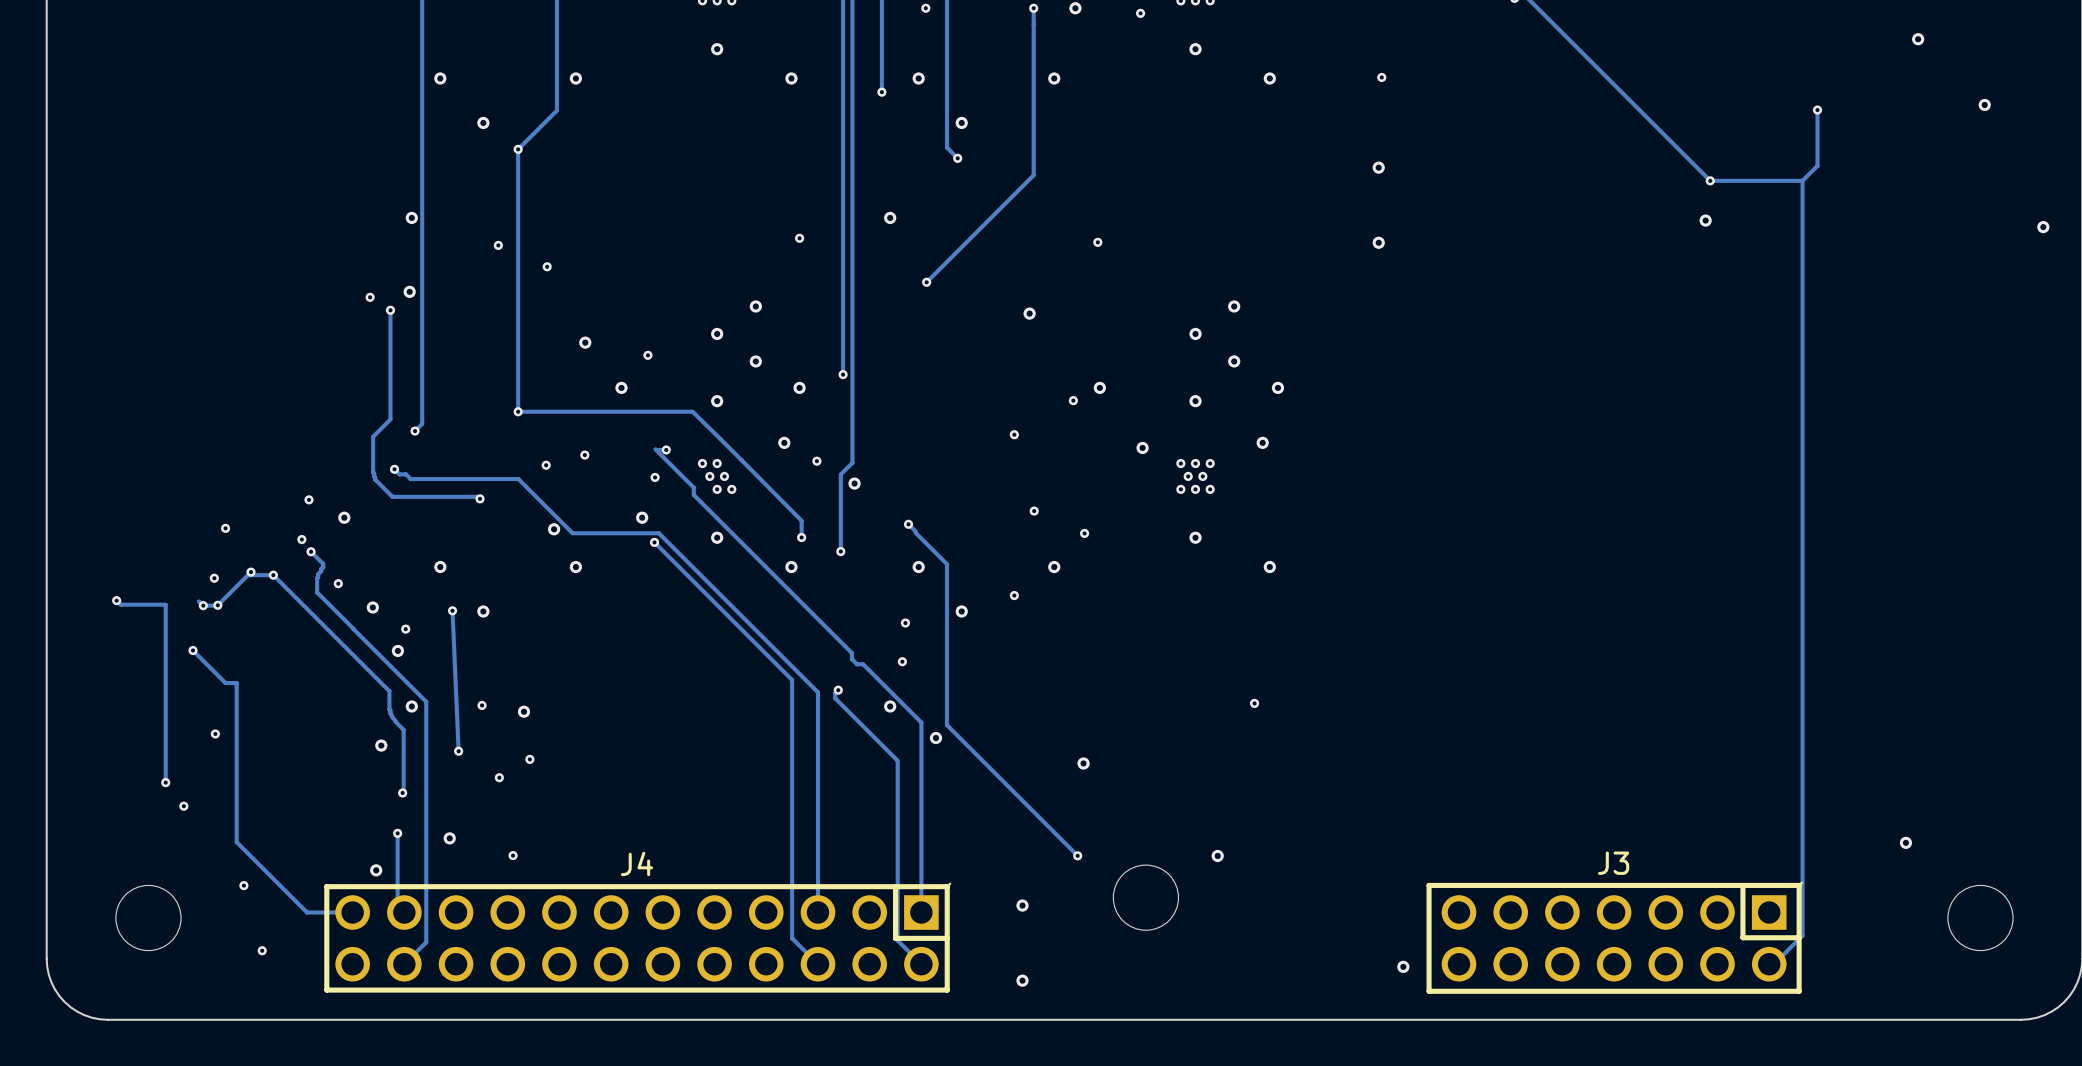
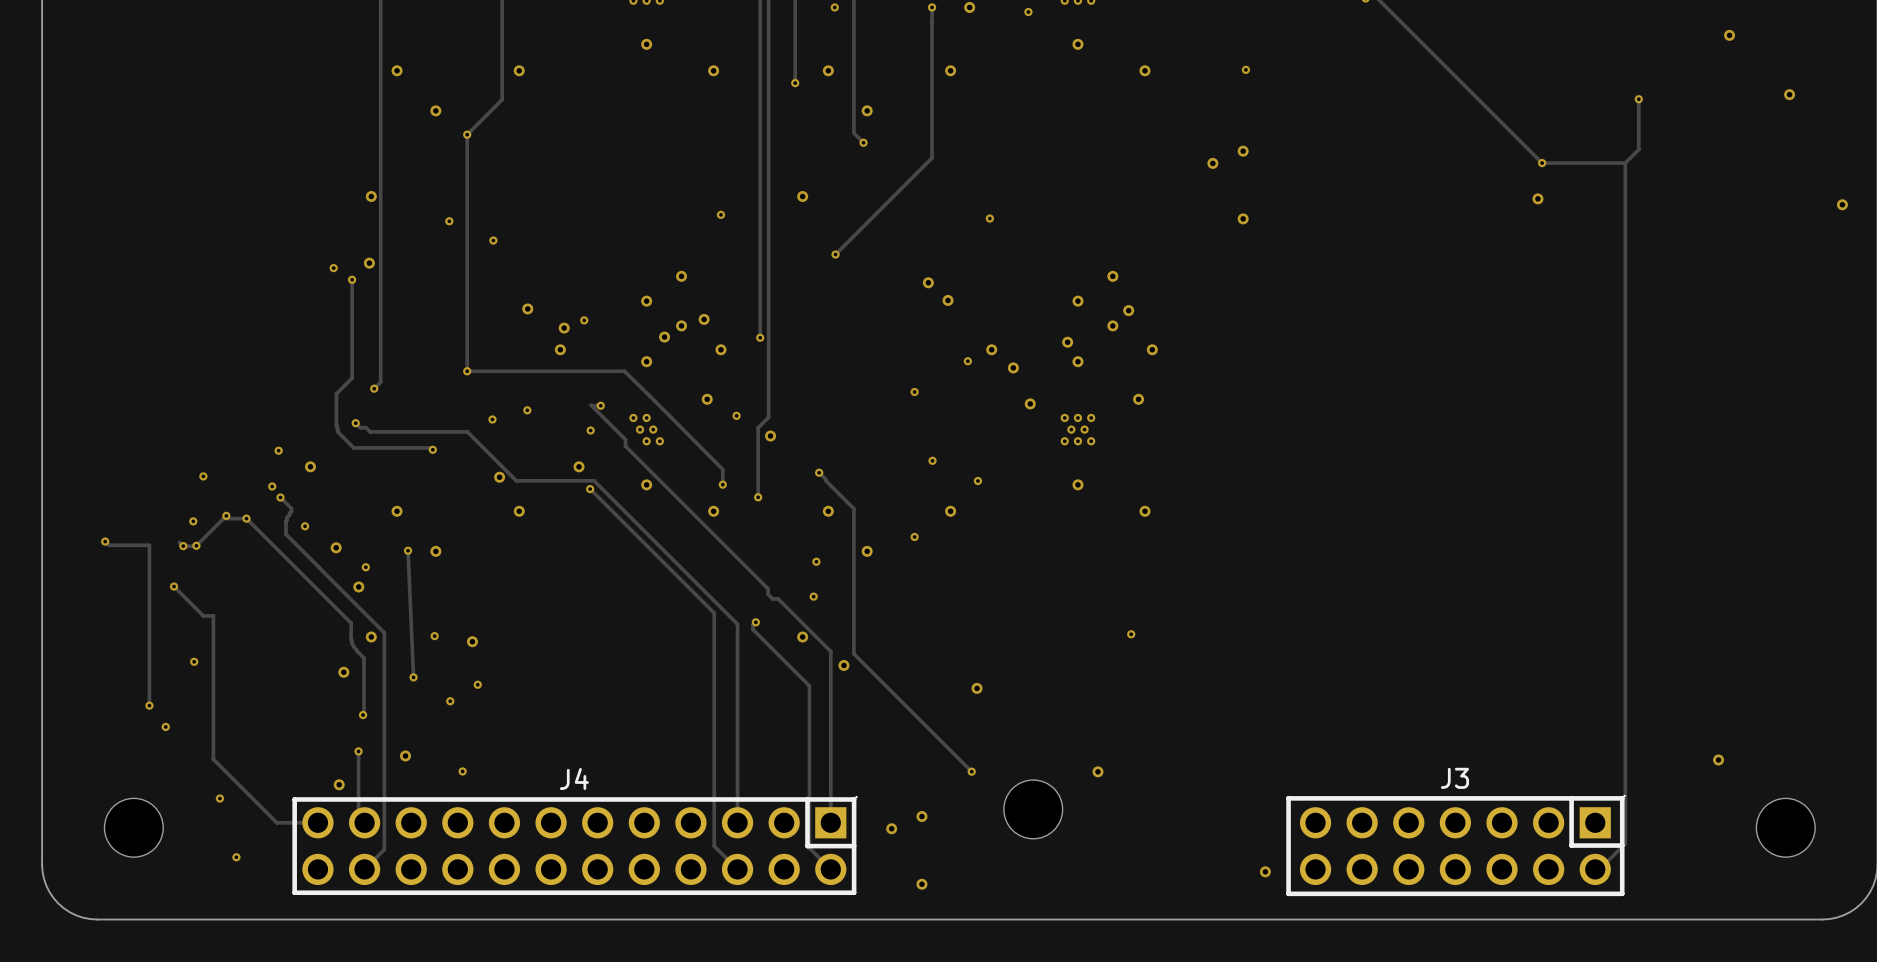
via: none -> (1212, 163)
via: none -> (948, 300)
via: none -> (1128, 310)
via: none -> (704, 319)
via: none -> (564, 328)
via: none -> (664, 337)
via: none -> (1067, 342)
via: none -> (1013, 367)
via: none -> (891, 828)

